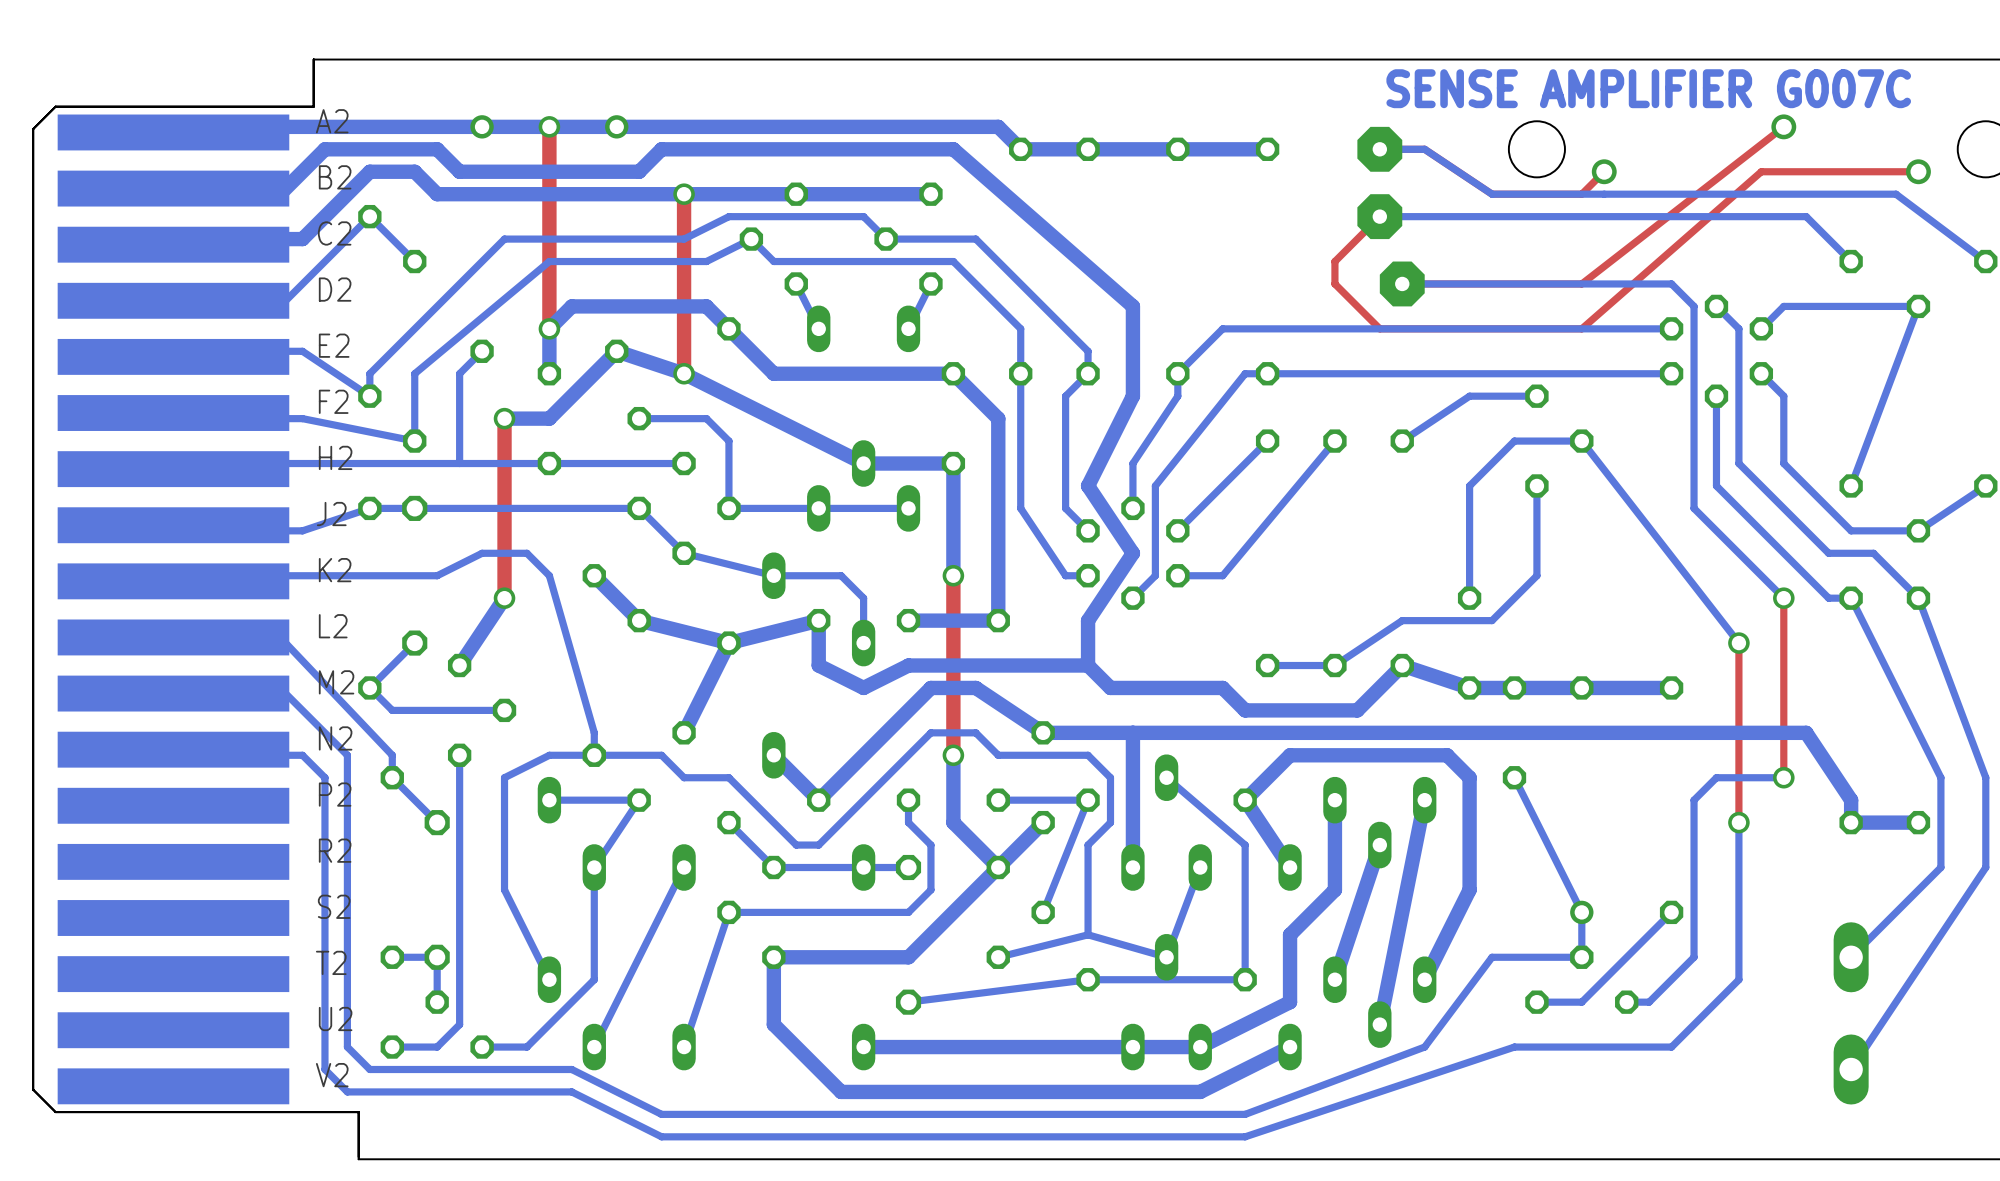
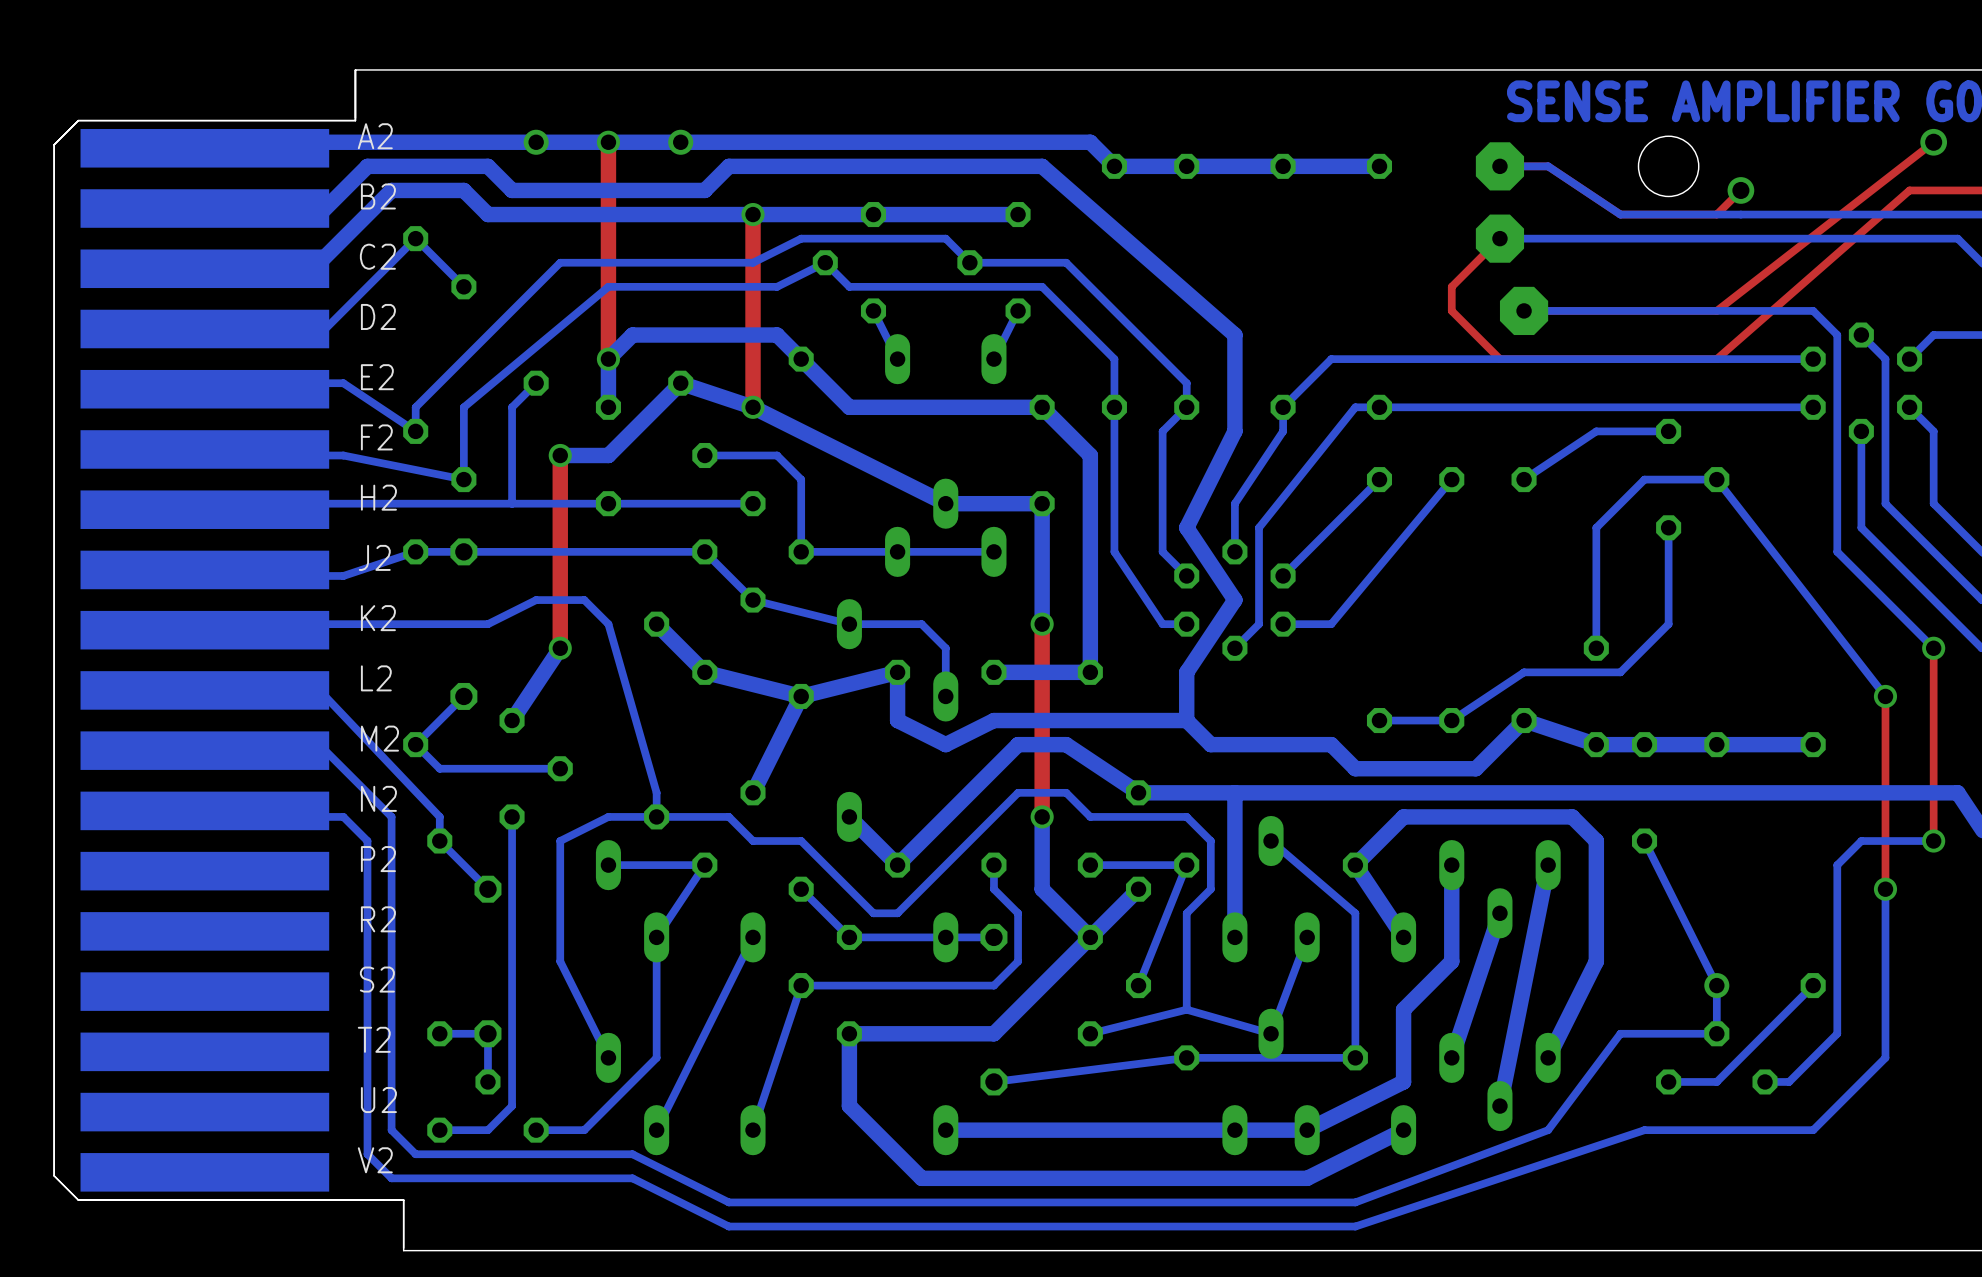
bottom track: (369, 171) (302, 239) (280, 239) -> (415, 190) (391, 190) (319, 262)

